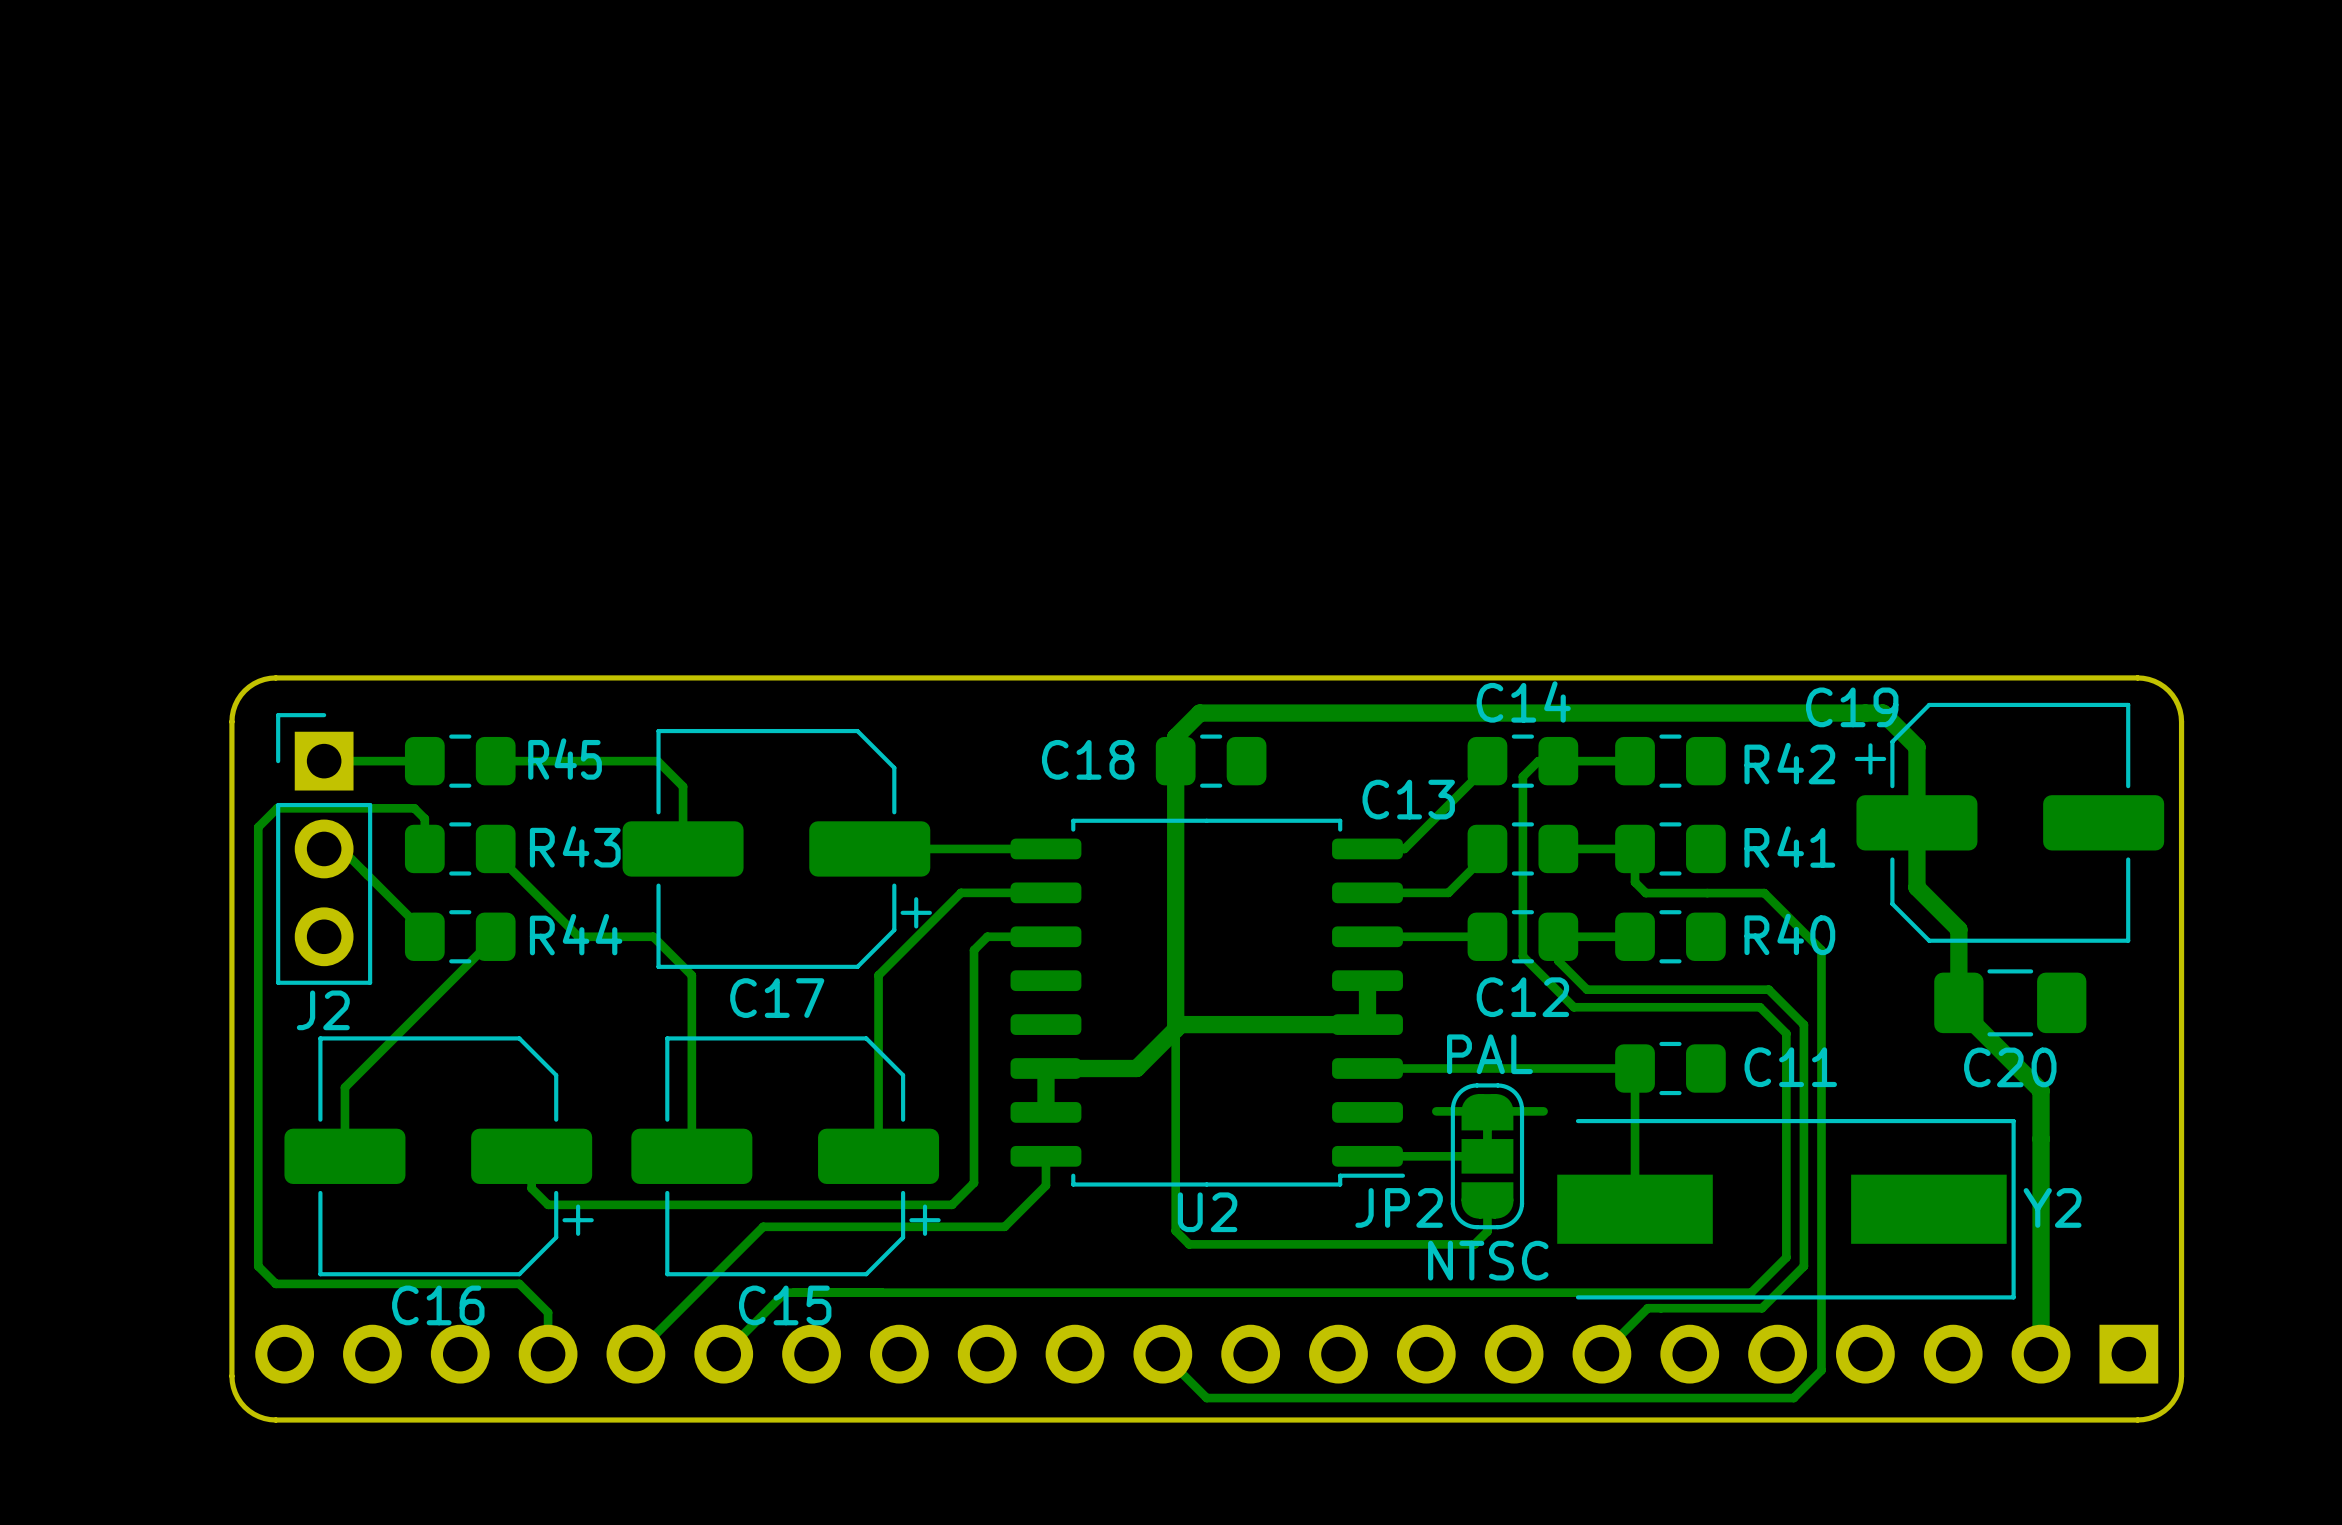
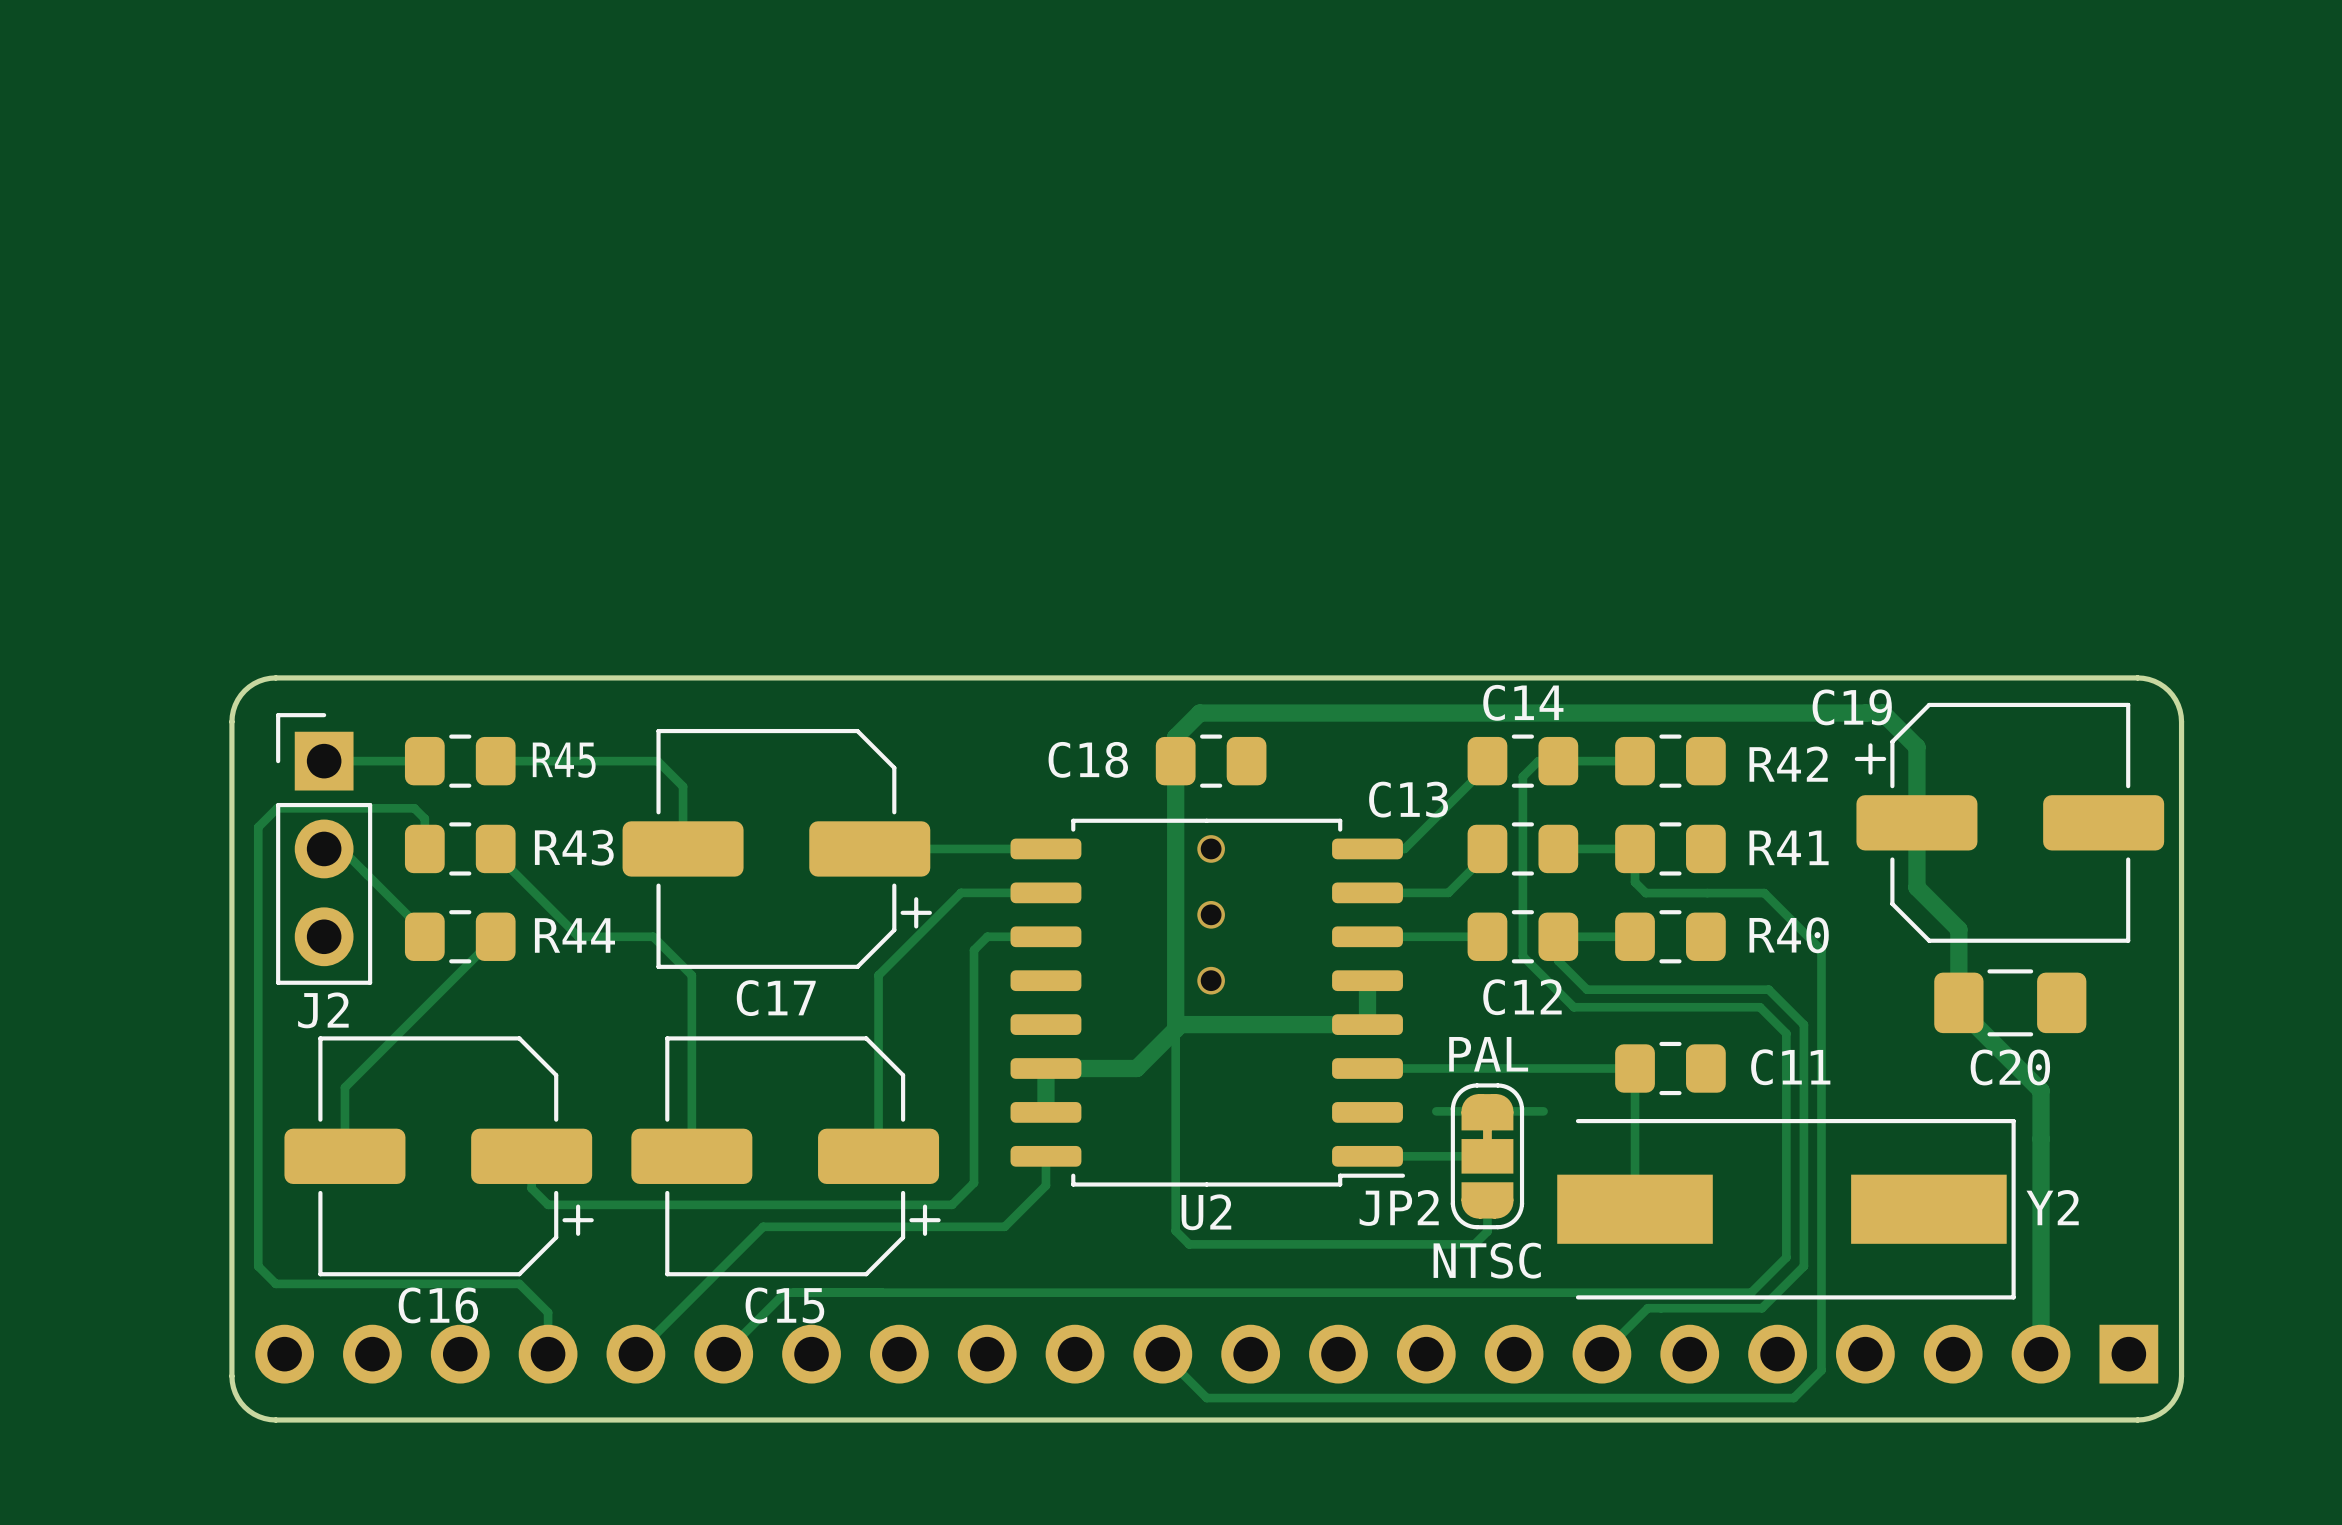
via: none -> (1211, 848)
via: none -> (1211, 914)
via: none -> (1211, 980)

